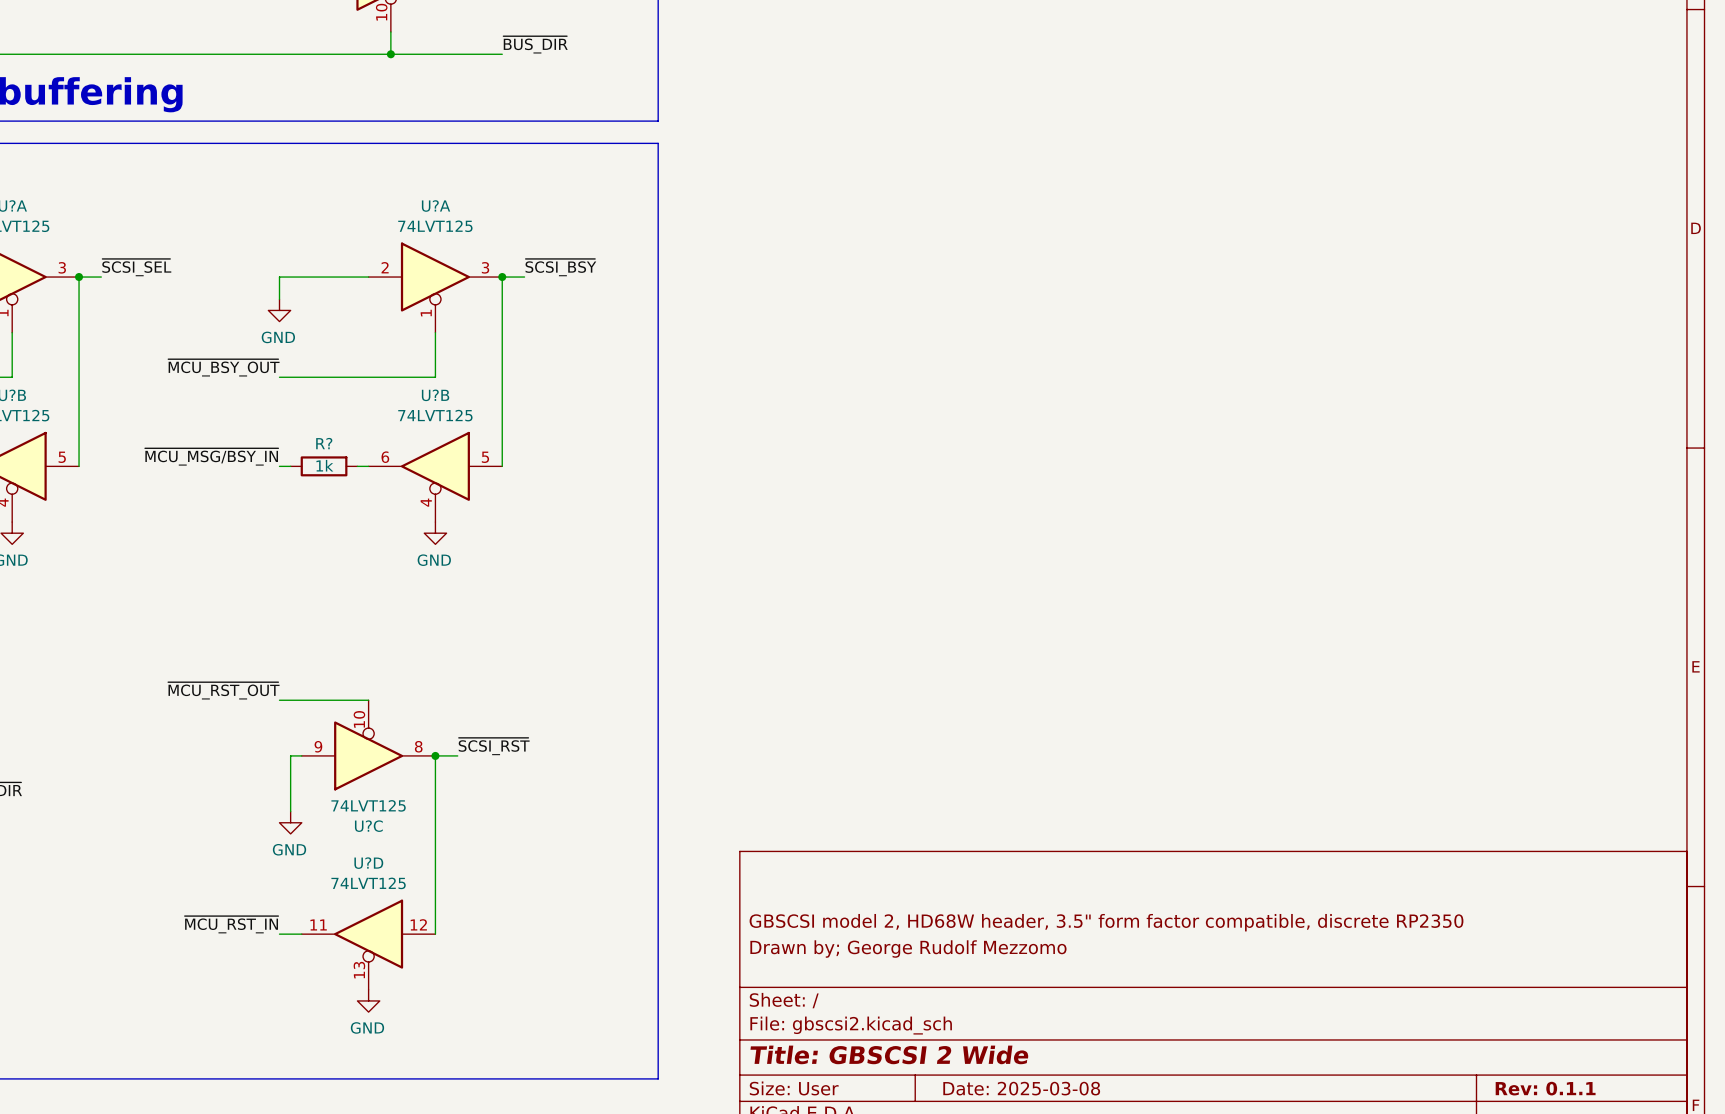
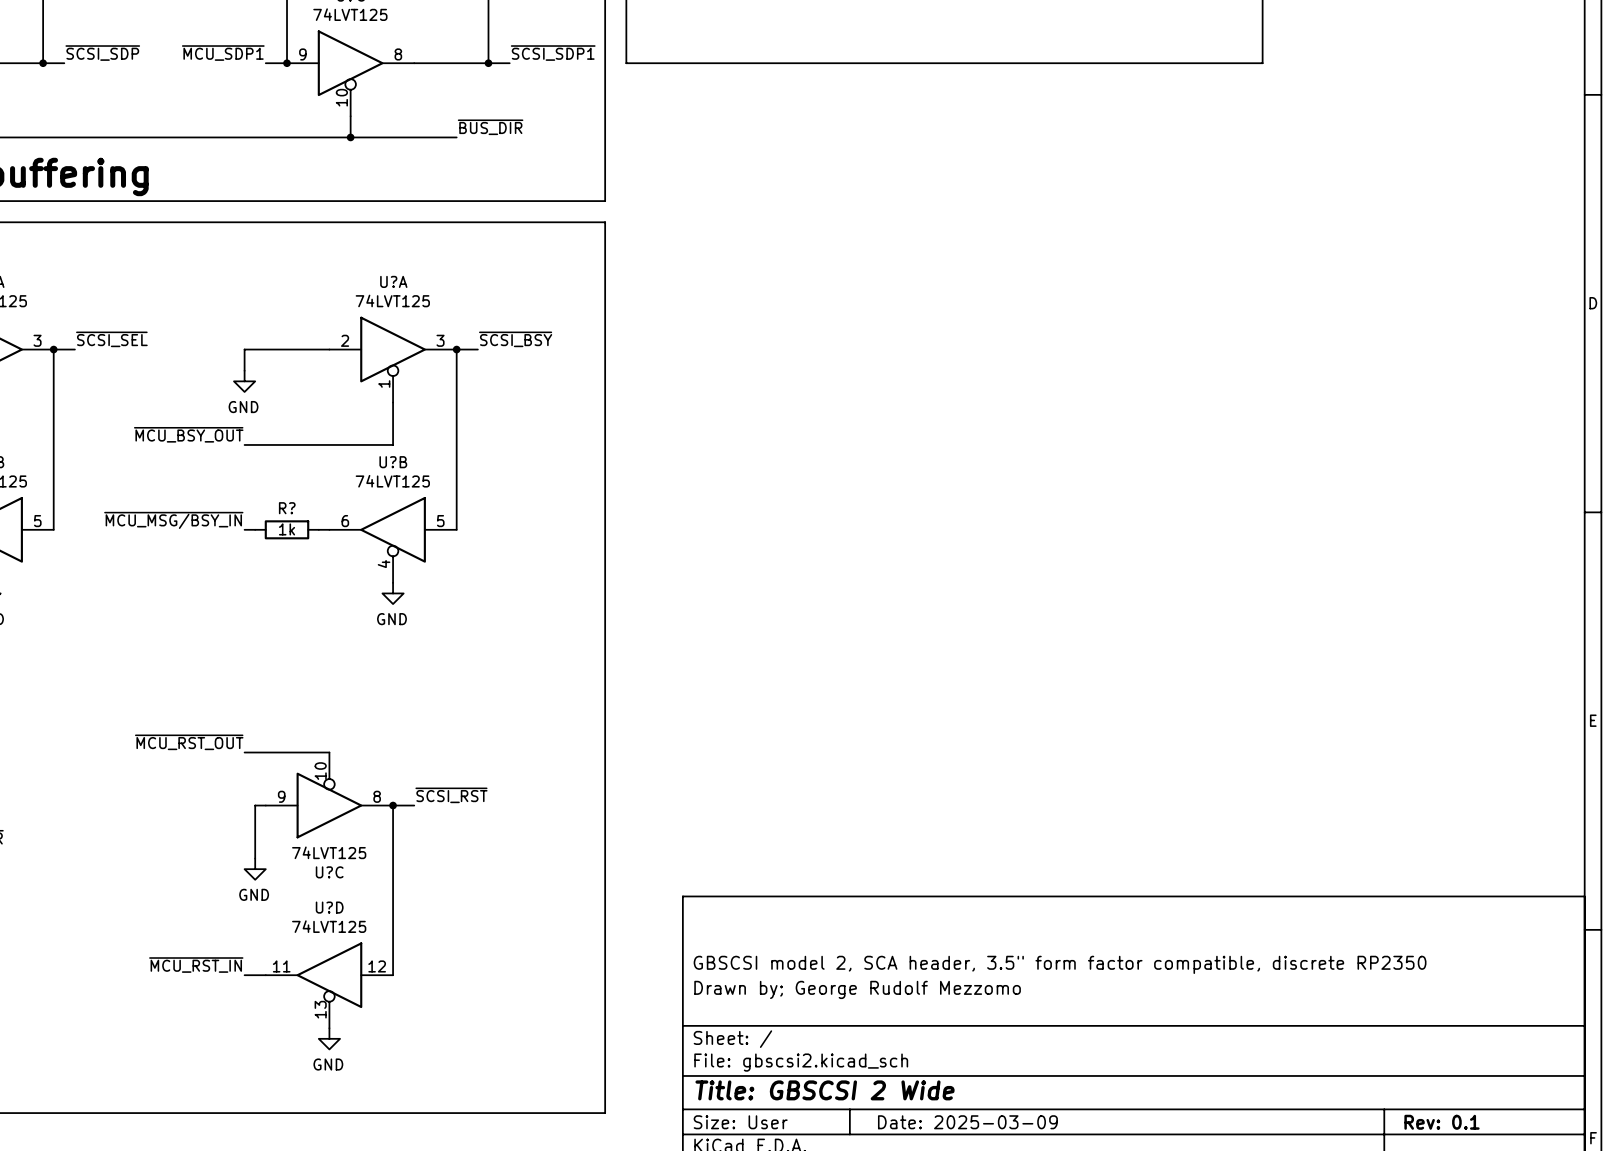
title block: GBSCSI model 2, HD68W header, 3.5" form factor compatible, discrete RP2350 (1106, 922) -> GBSCSI model 2, SCA header, 3.5" form factor compatible, discrete RP2350 (1060, 964)
title block: Date: 2025-03-08 (1021, 1088) -> Date: 2025-03-09 (967, 1122)
title block: Rev: 0.1.1 (1545, 1088) -> Rev: 0.1 (1442, 1122)

